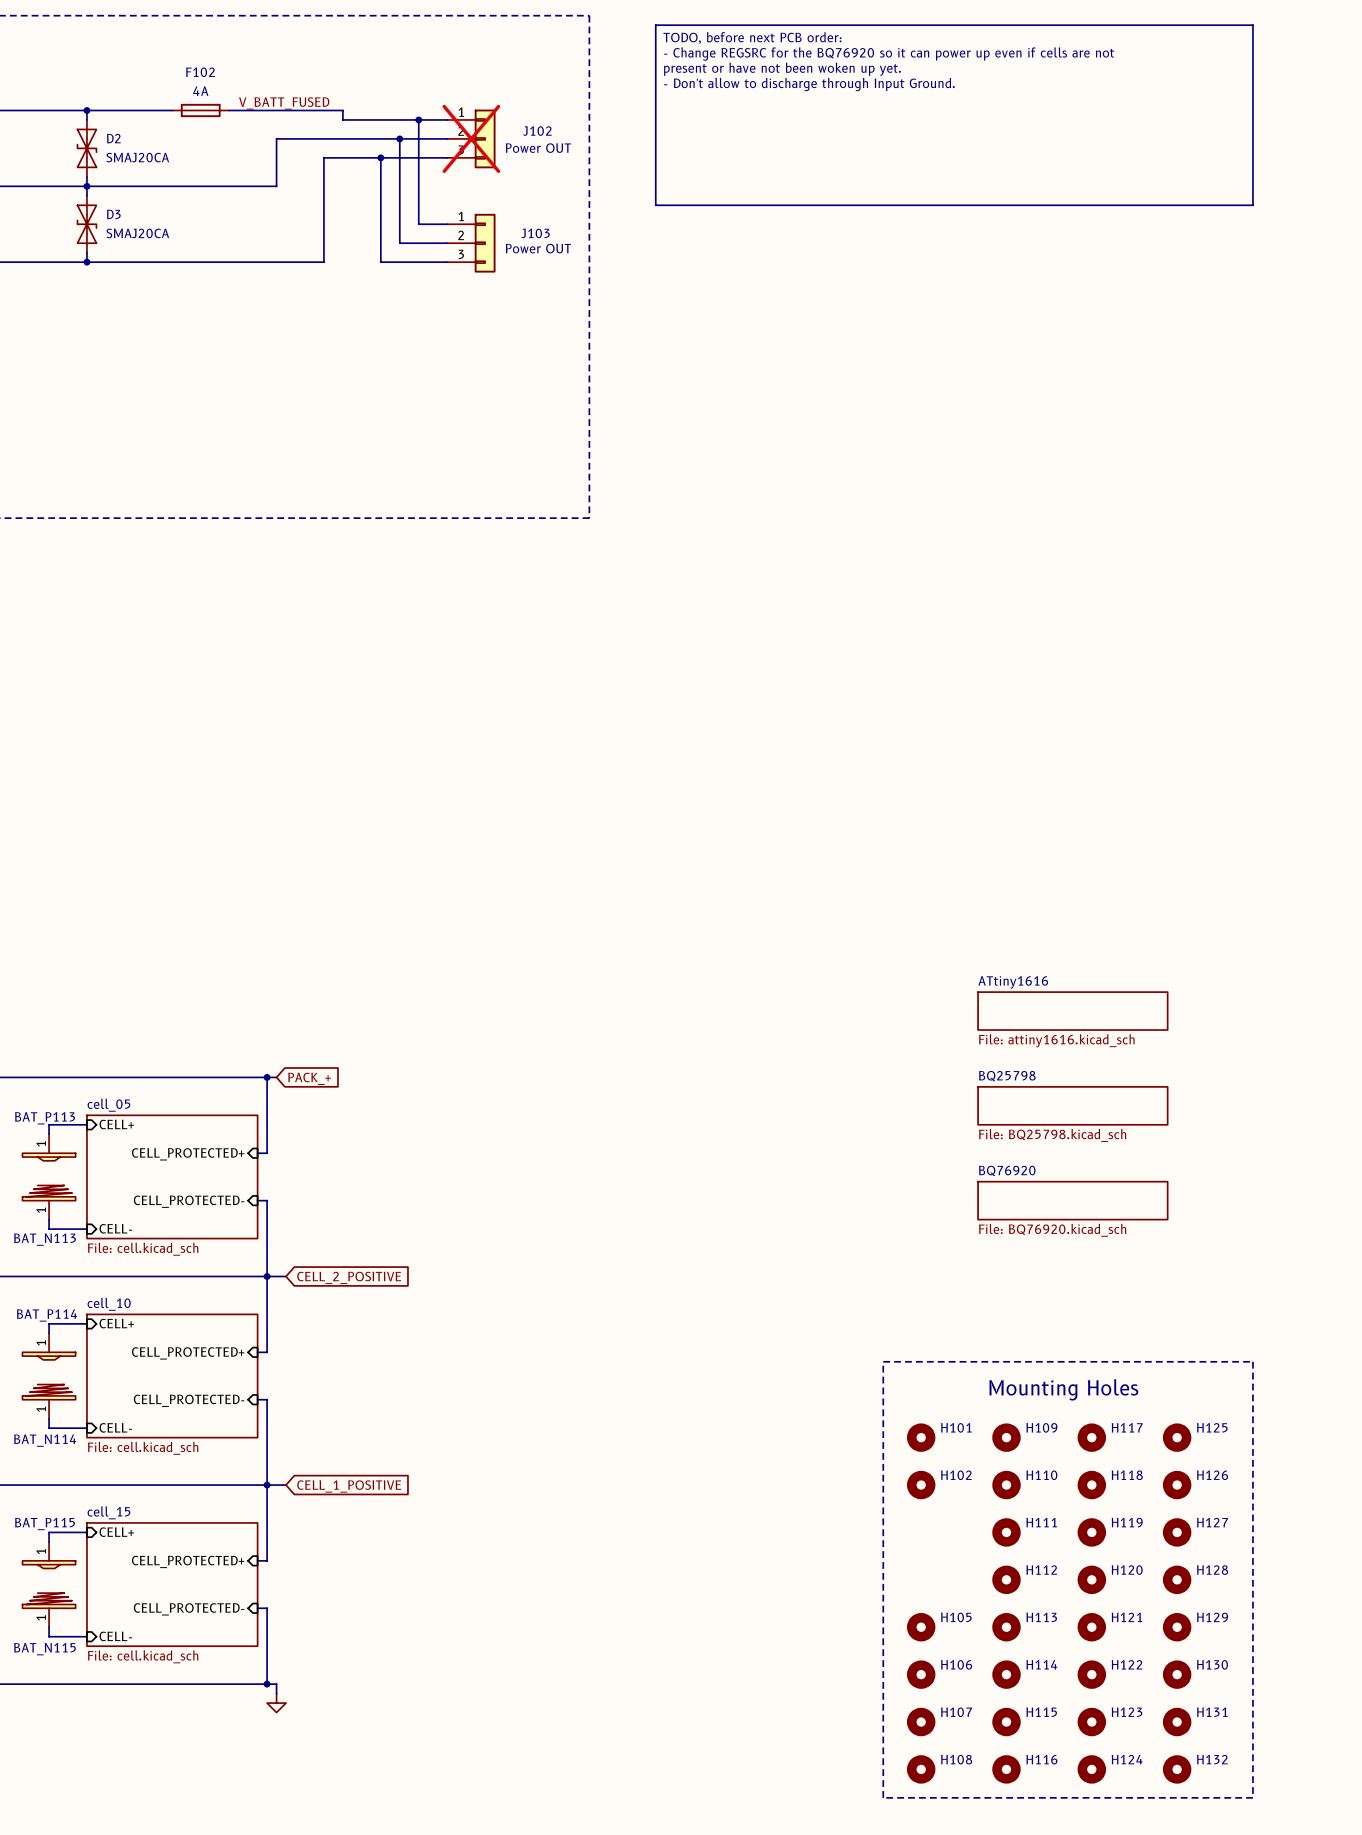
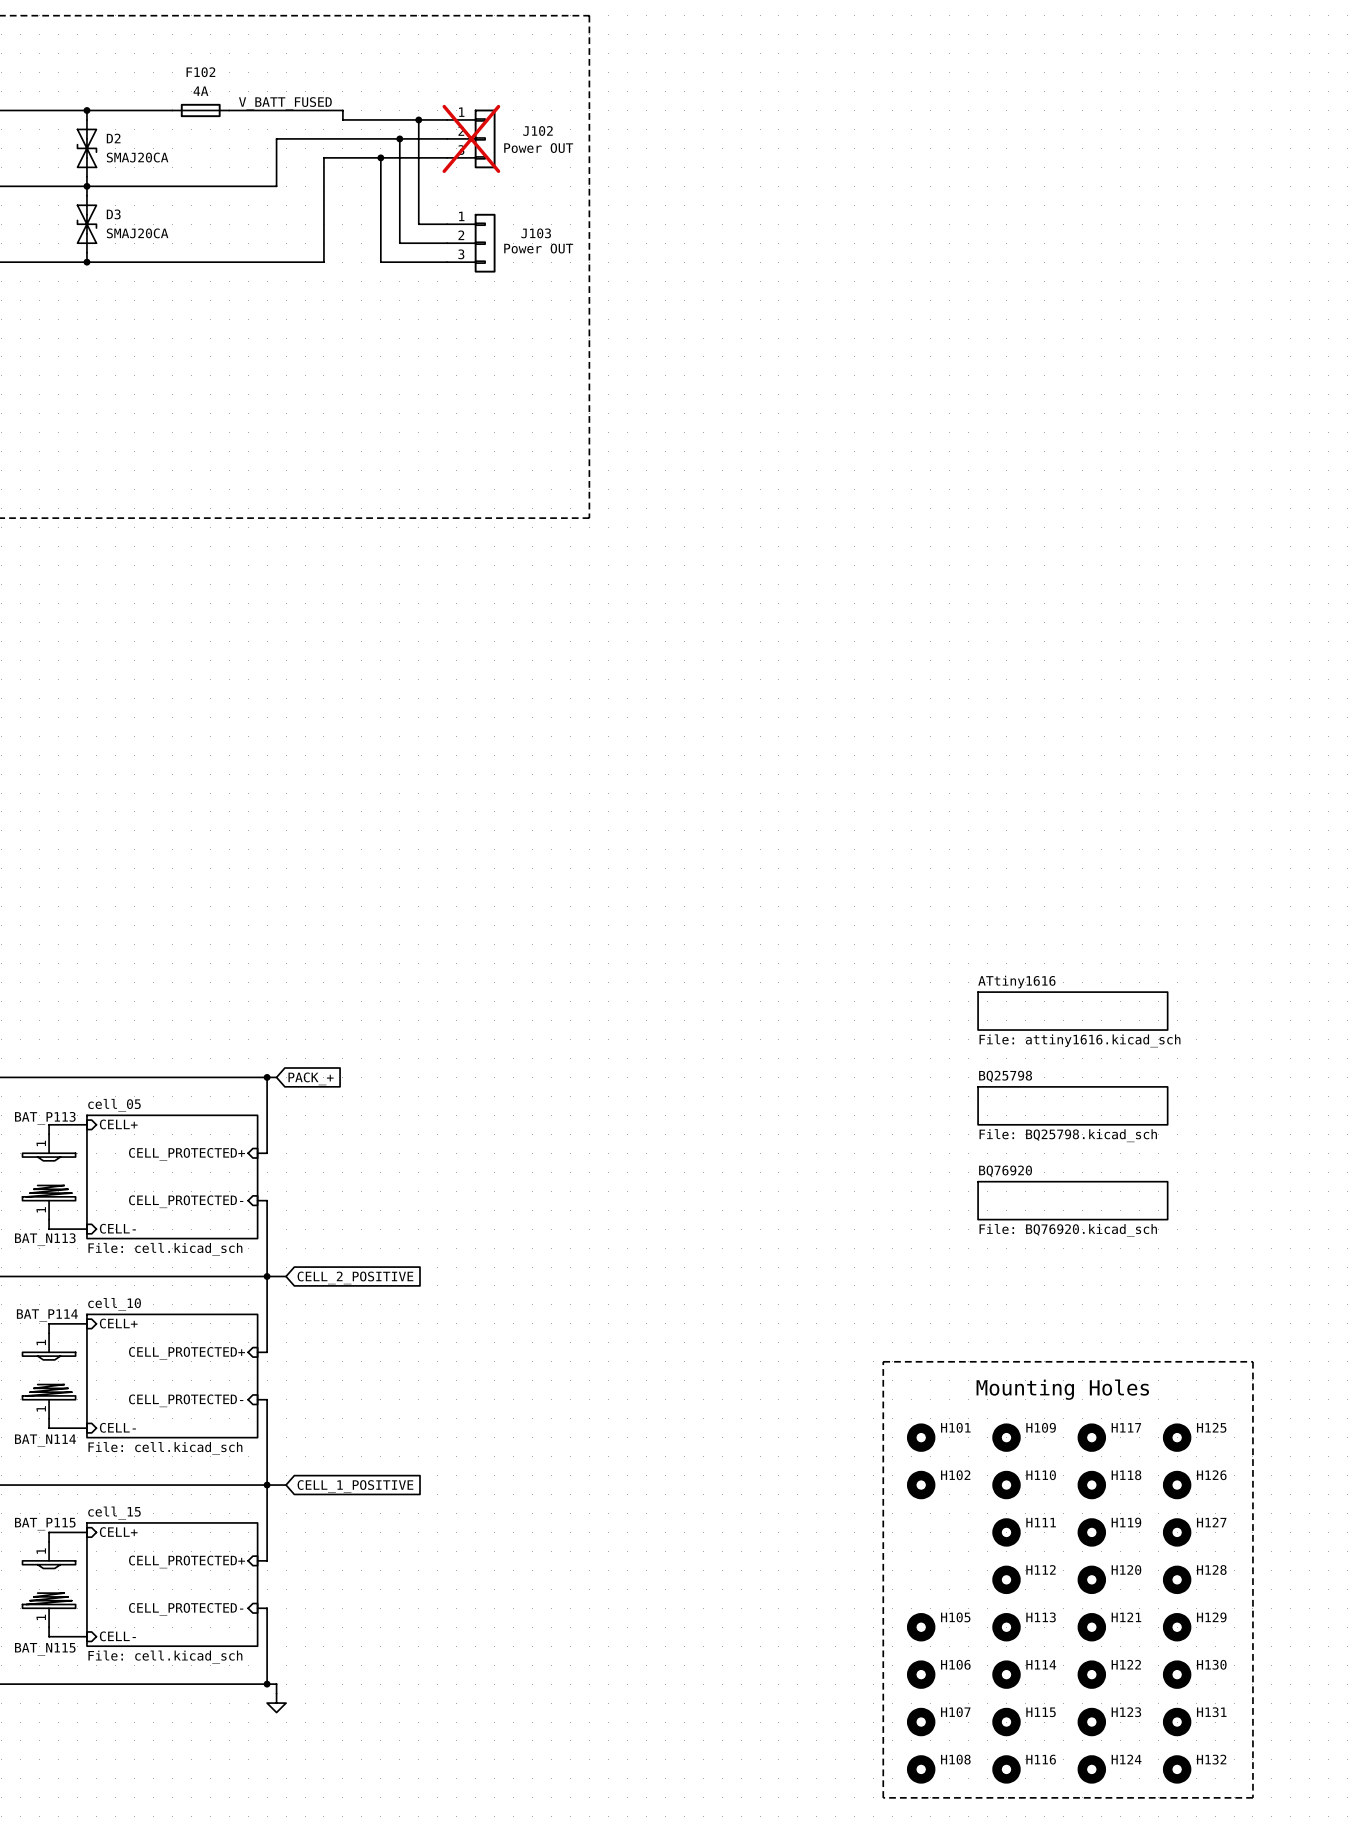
line: (655, 25) (1252, 25) (1252, 205) (655, 205) (655, 25) -> none
text: TODO, before next PCB order: (752, 38) -> none
text: - Change REGSRC for the BQ76920 so it can power up even if cells are not (889, 54) -> none
text: present or have not been woken up yet. (782, 69) -> none
text: - Don't allow to discharge through Input Ground. (809, 84) -> none

